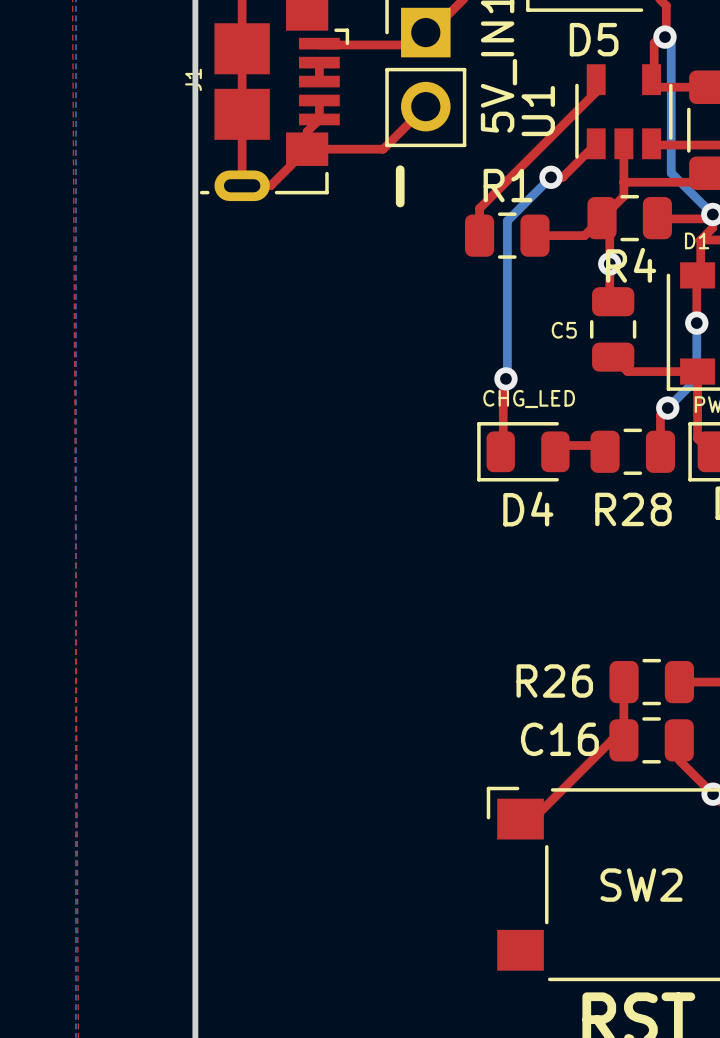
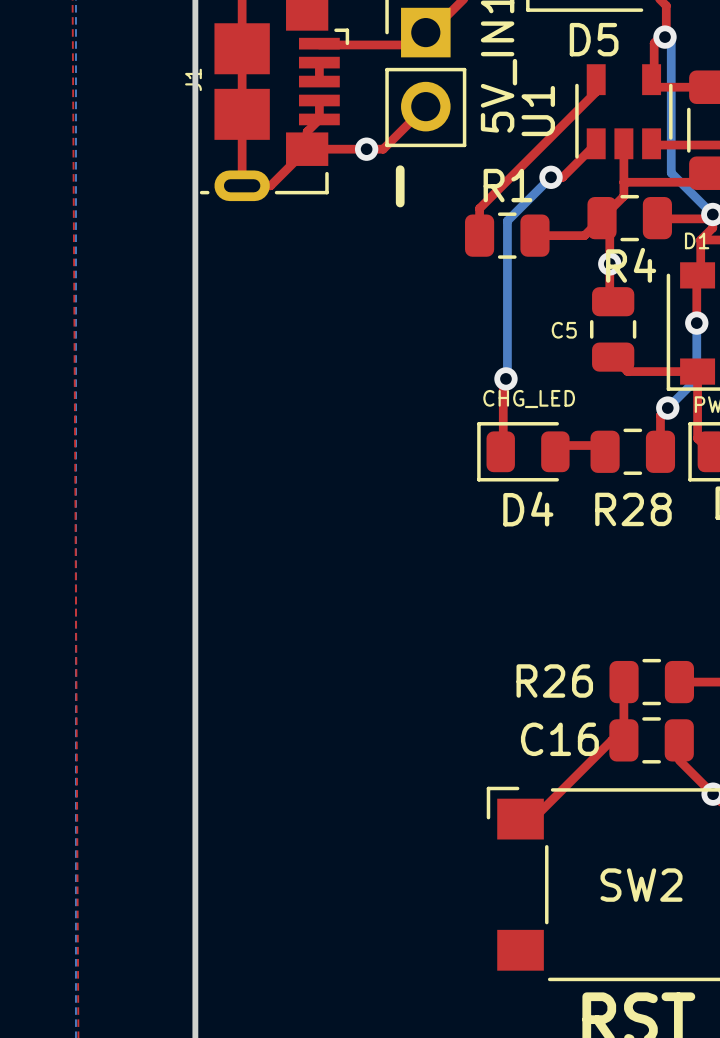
via: none -> (366, 149)

